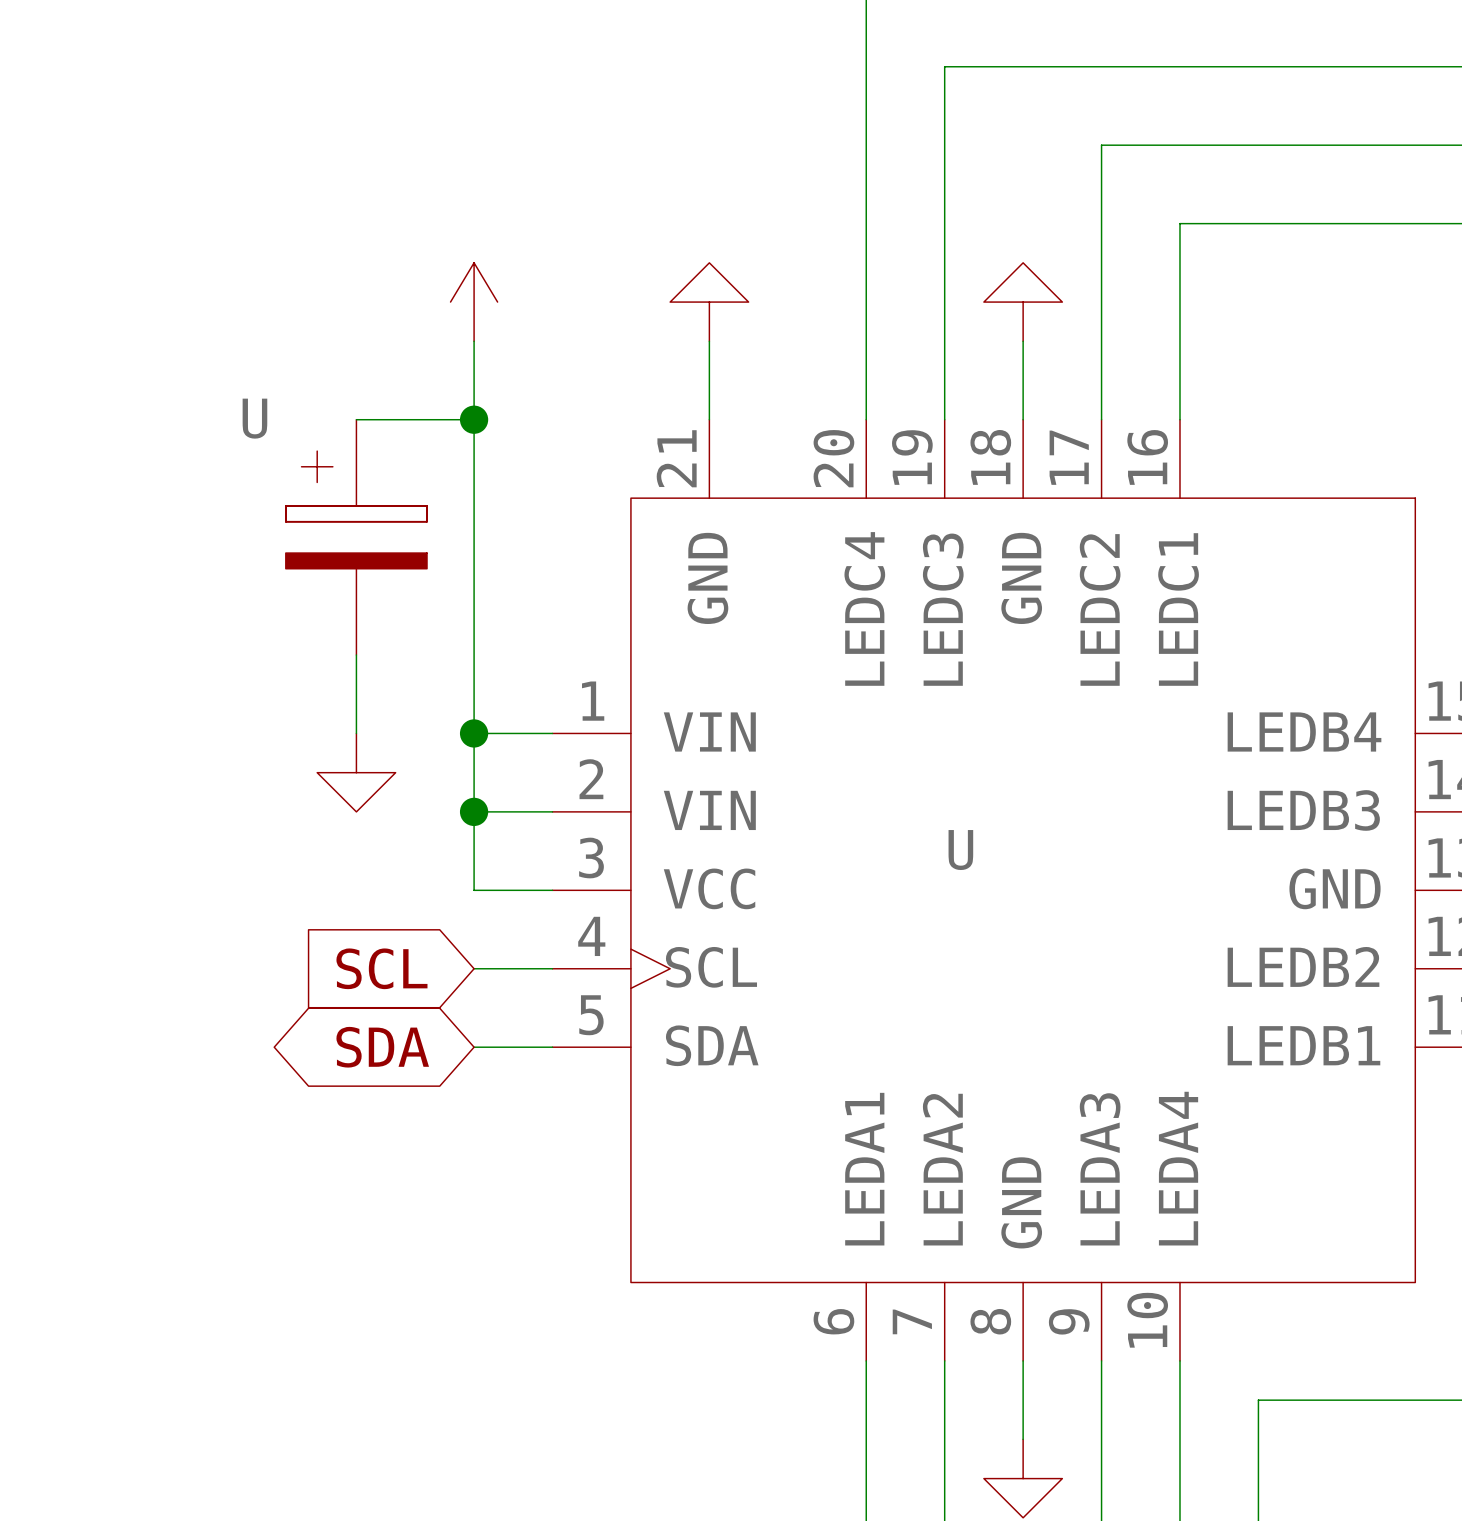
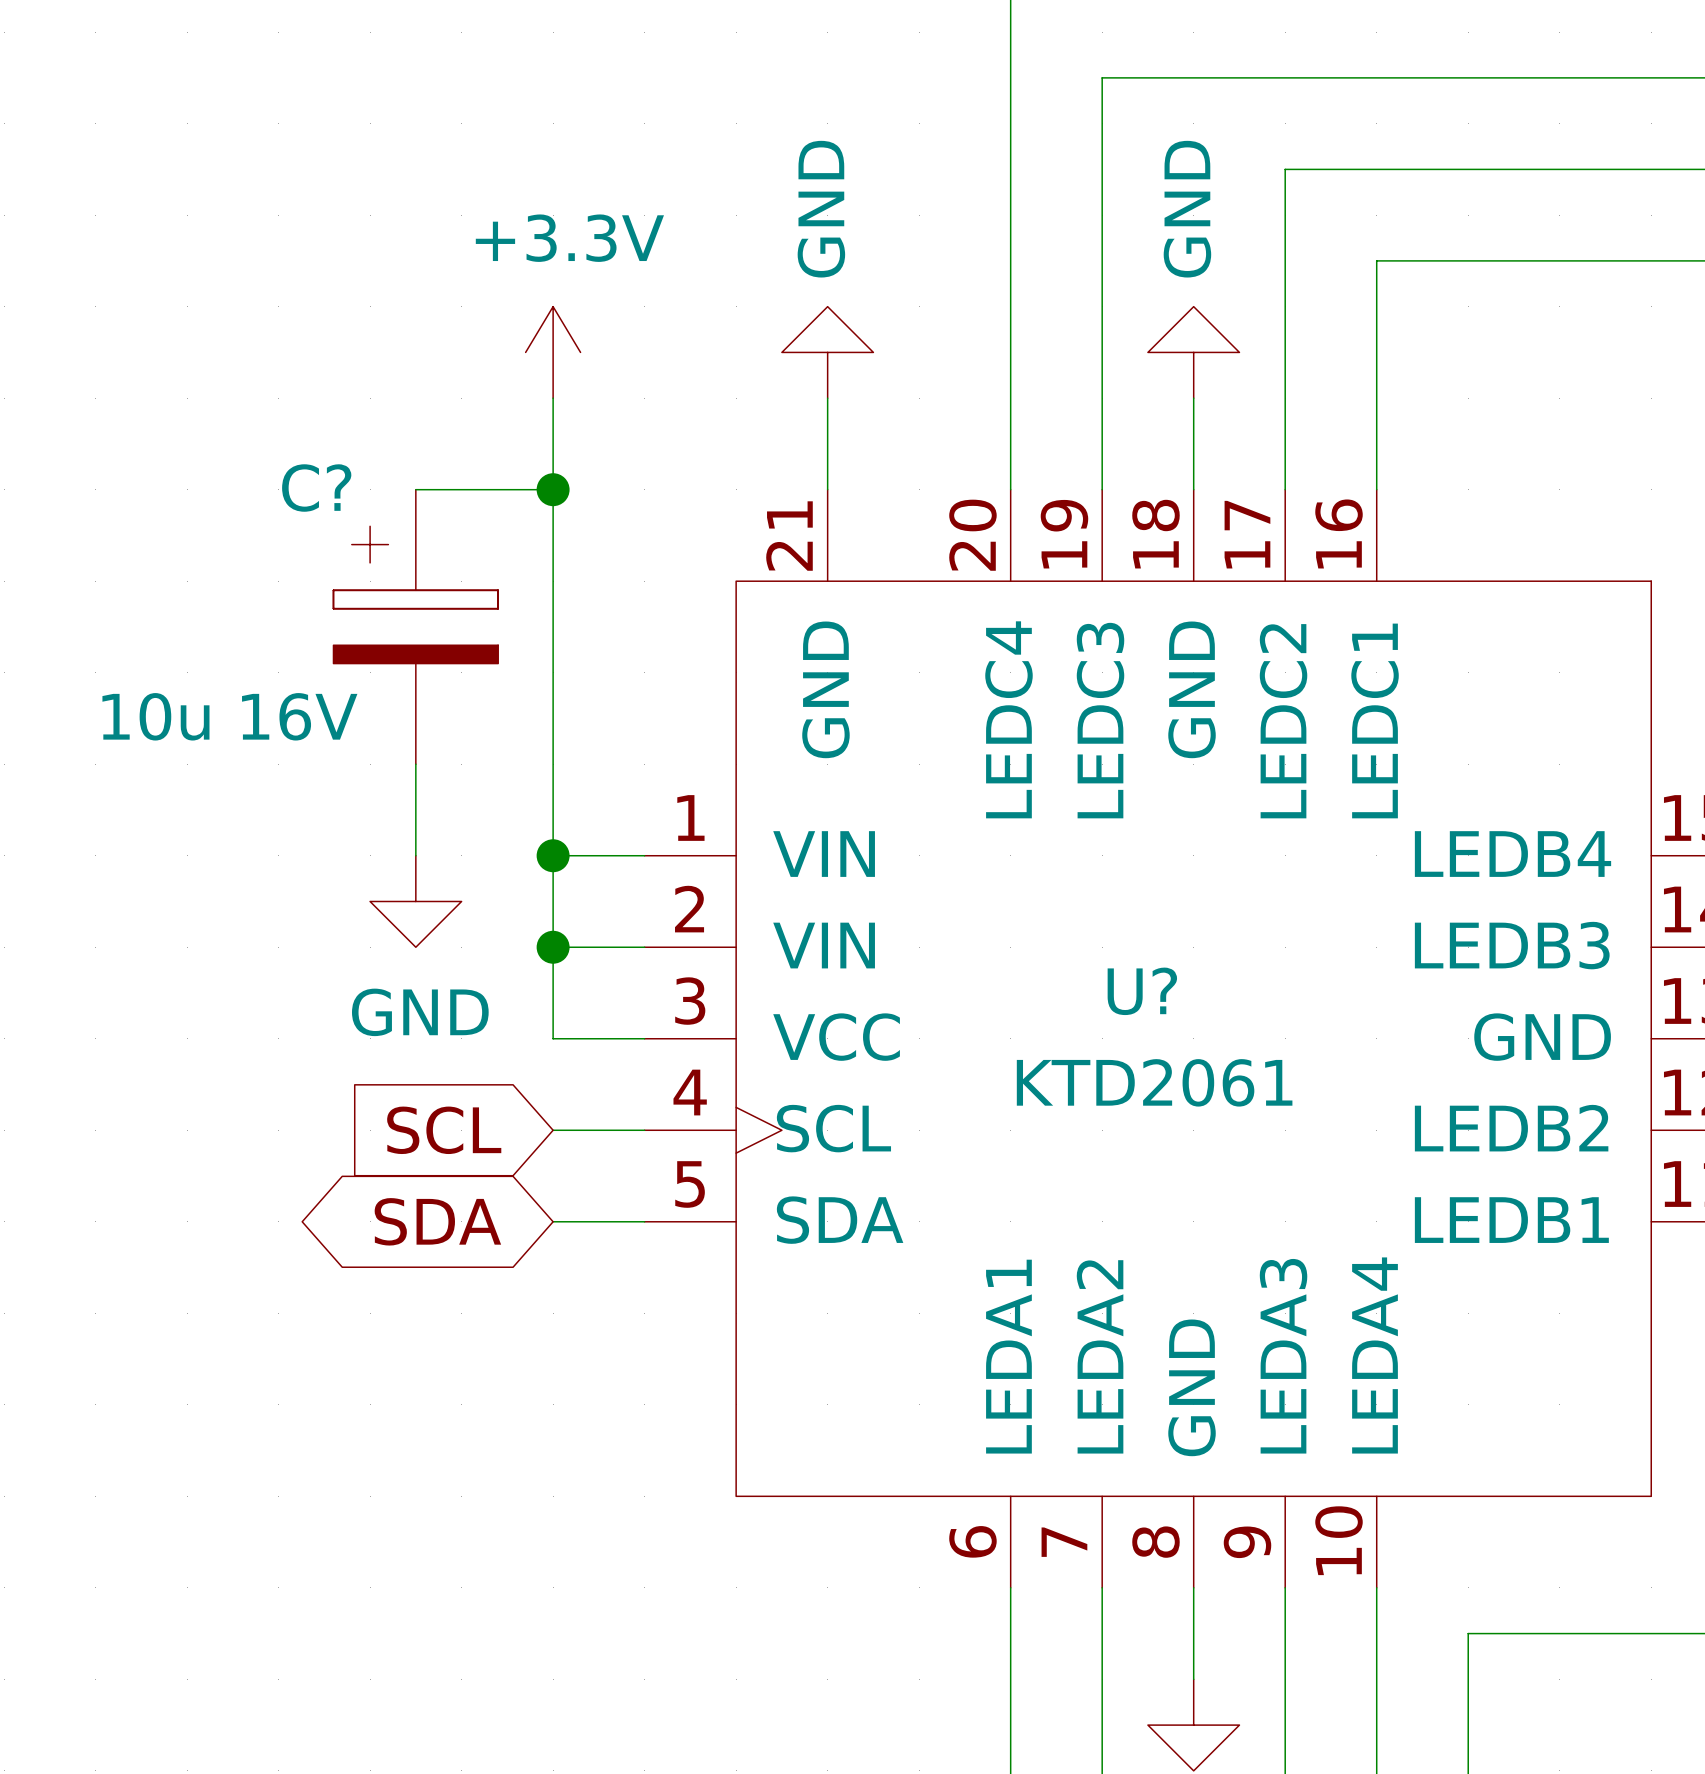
power symbol text: none -> GND (821, 209)
power symbol text: none -> GND (1187, 209)
power symbol text: none -> +3.3V (569, 238)
U name: U (254, 418) -> C? (316, 488)
U value: none -> 10u 16V (229, 716)
U name: U (960, 850) -> U? (1142, 991)
power symbol text: none -> GND (420, 1012)
U value: none -> KTD2061 (1154, 1082)

